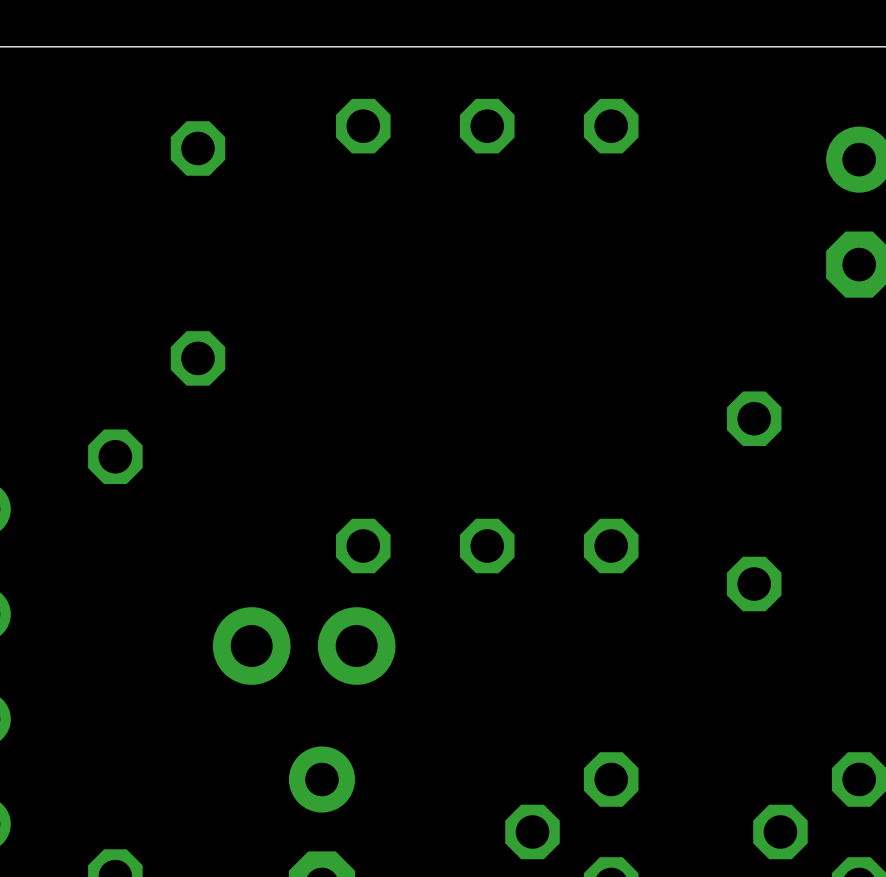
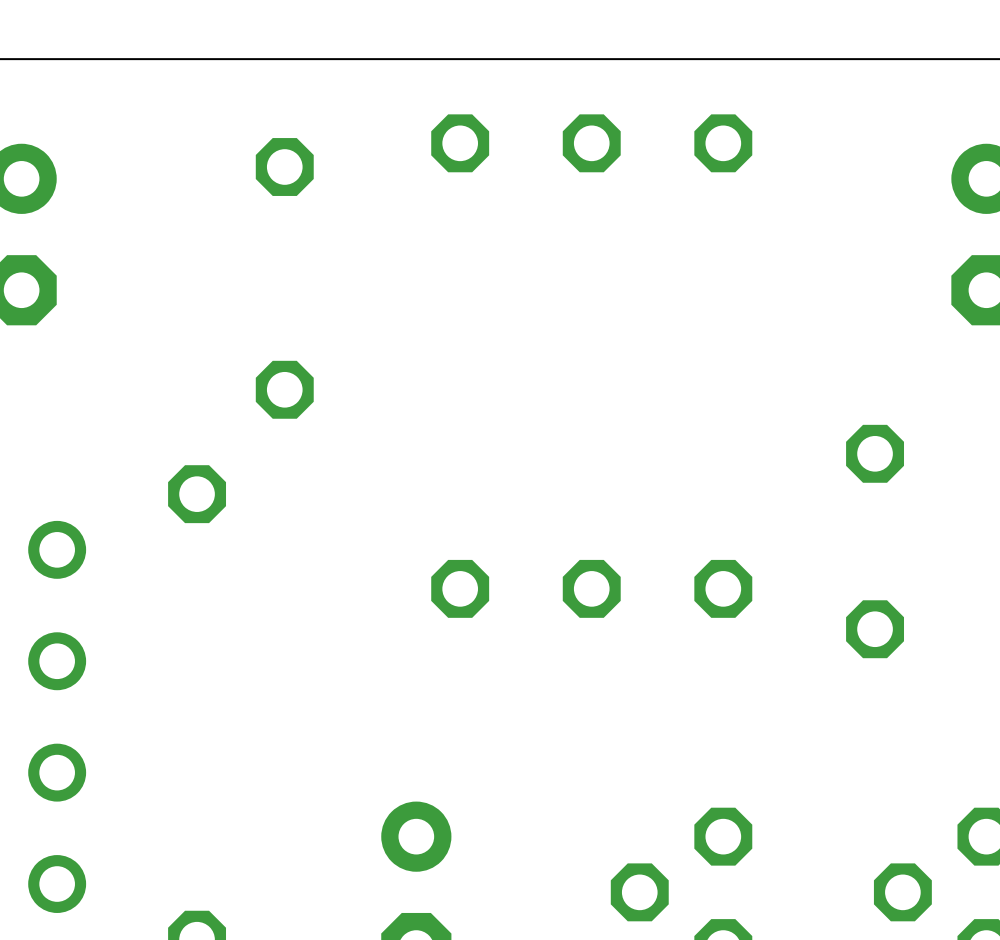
part: (304, 646) -> none

